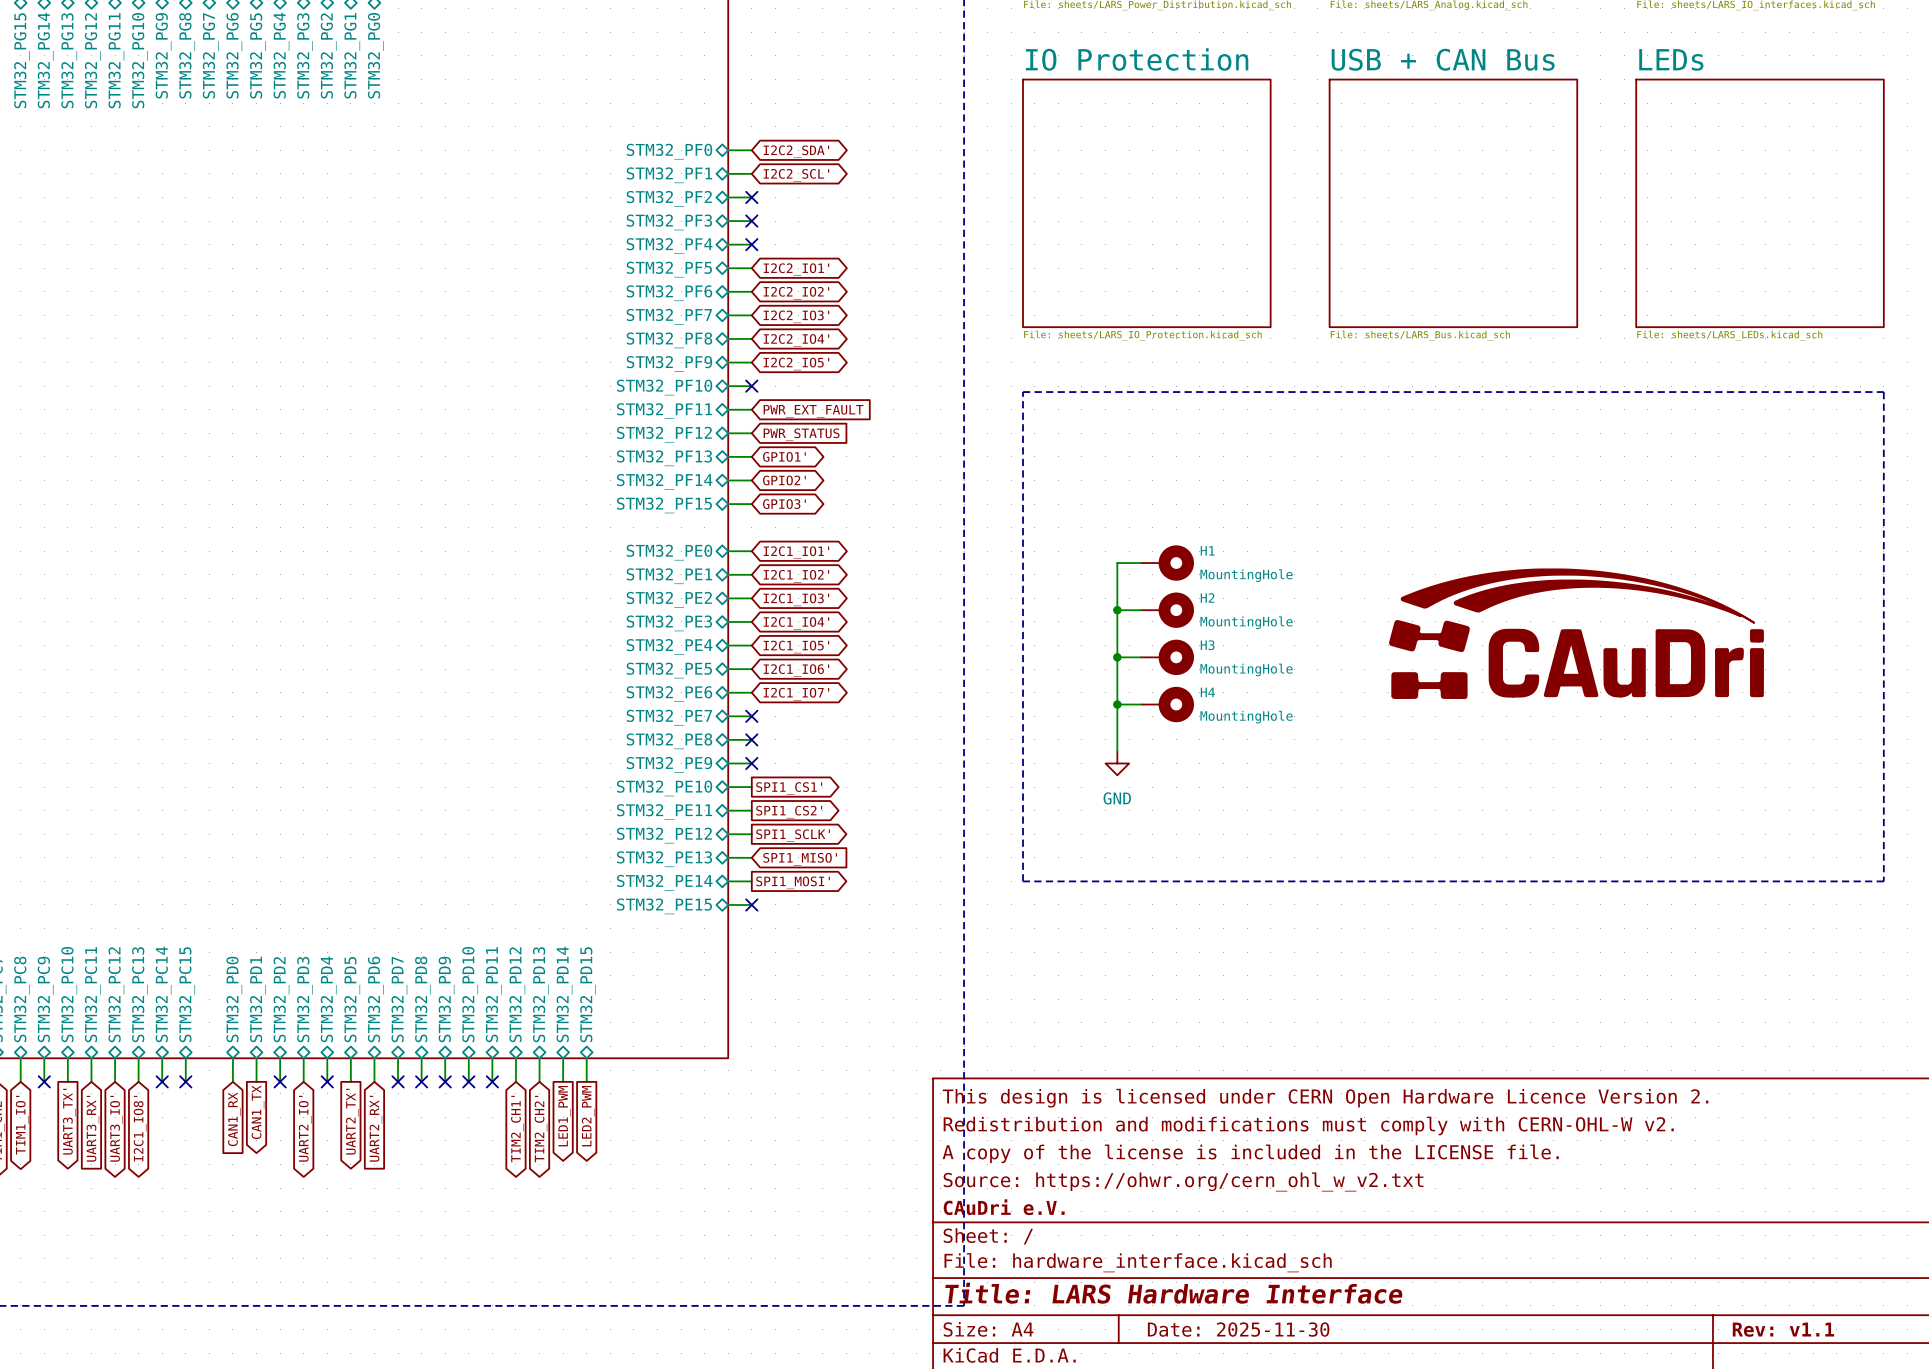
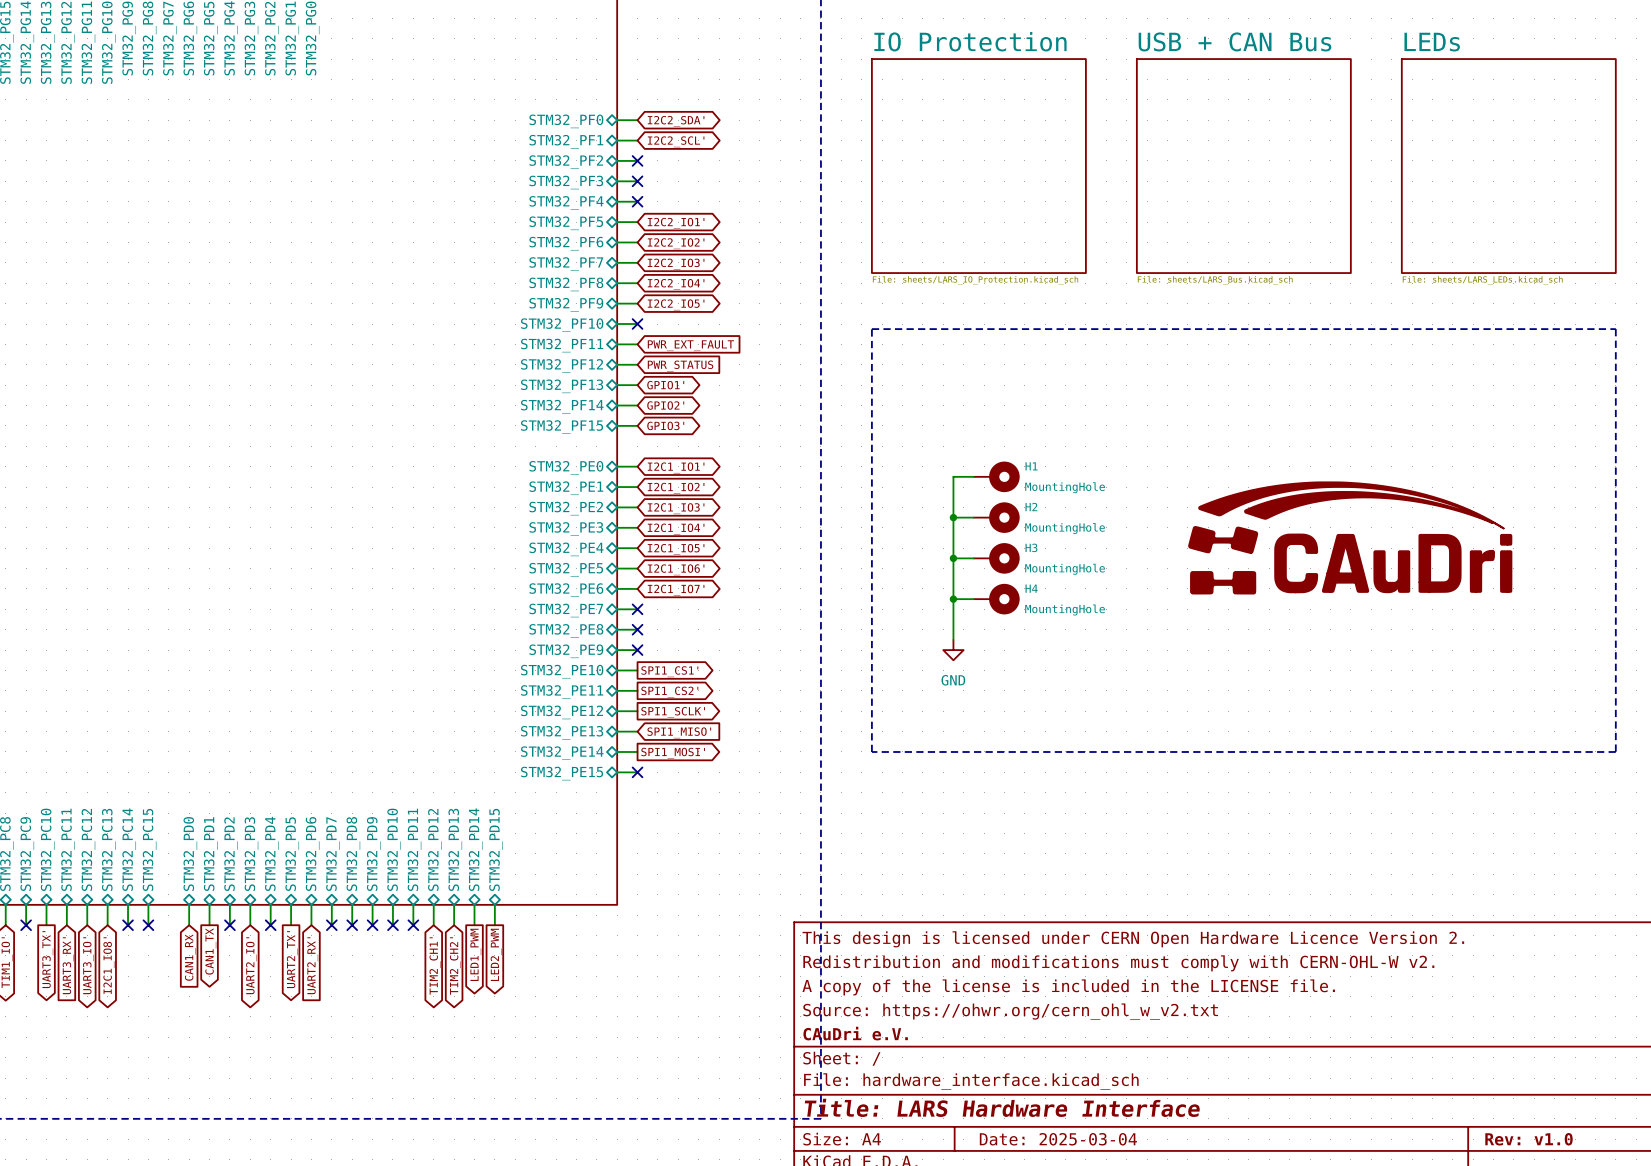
title block: Date: 2025-11-30 (1238, 1329) -> Date: 2025-03-04 (1058, 1139)
title block: Rev: v1.1 (1783, 1329) -> Rev: v1.0 (1528, 1139)

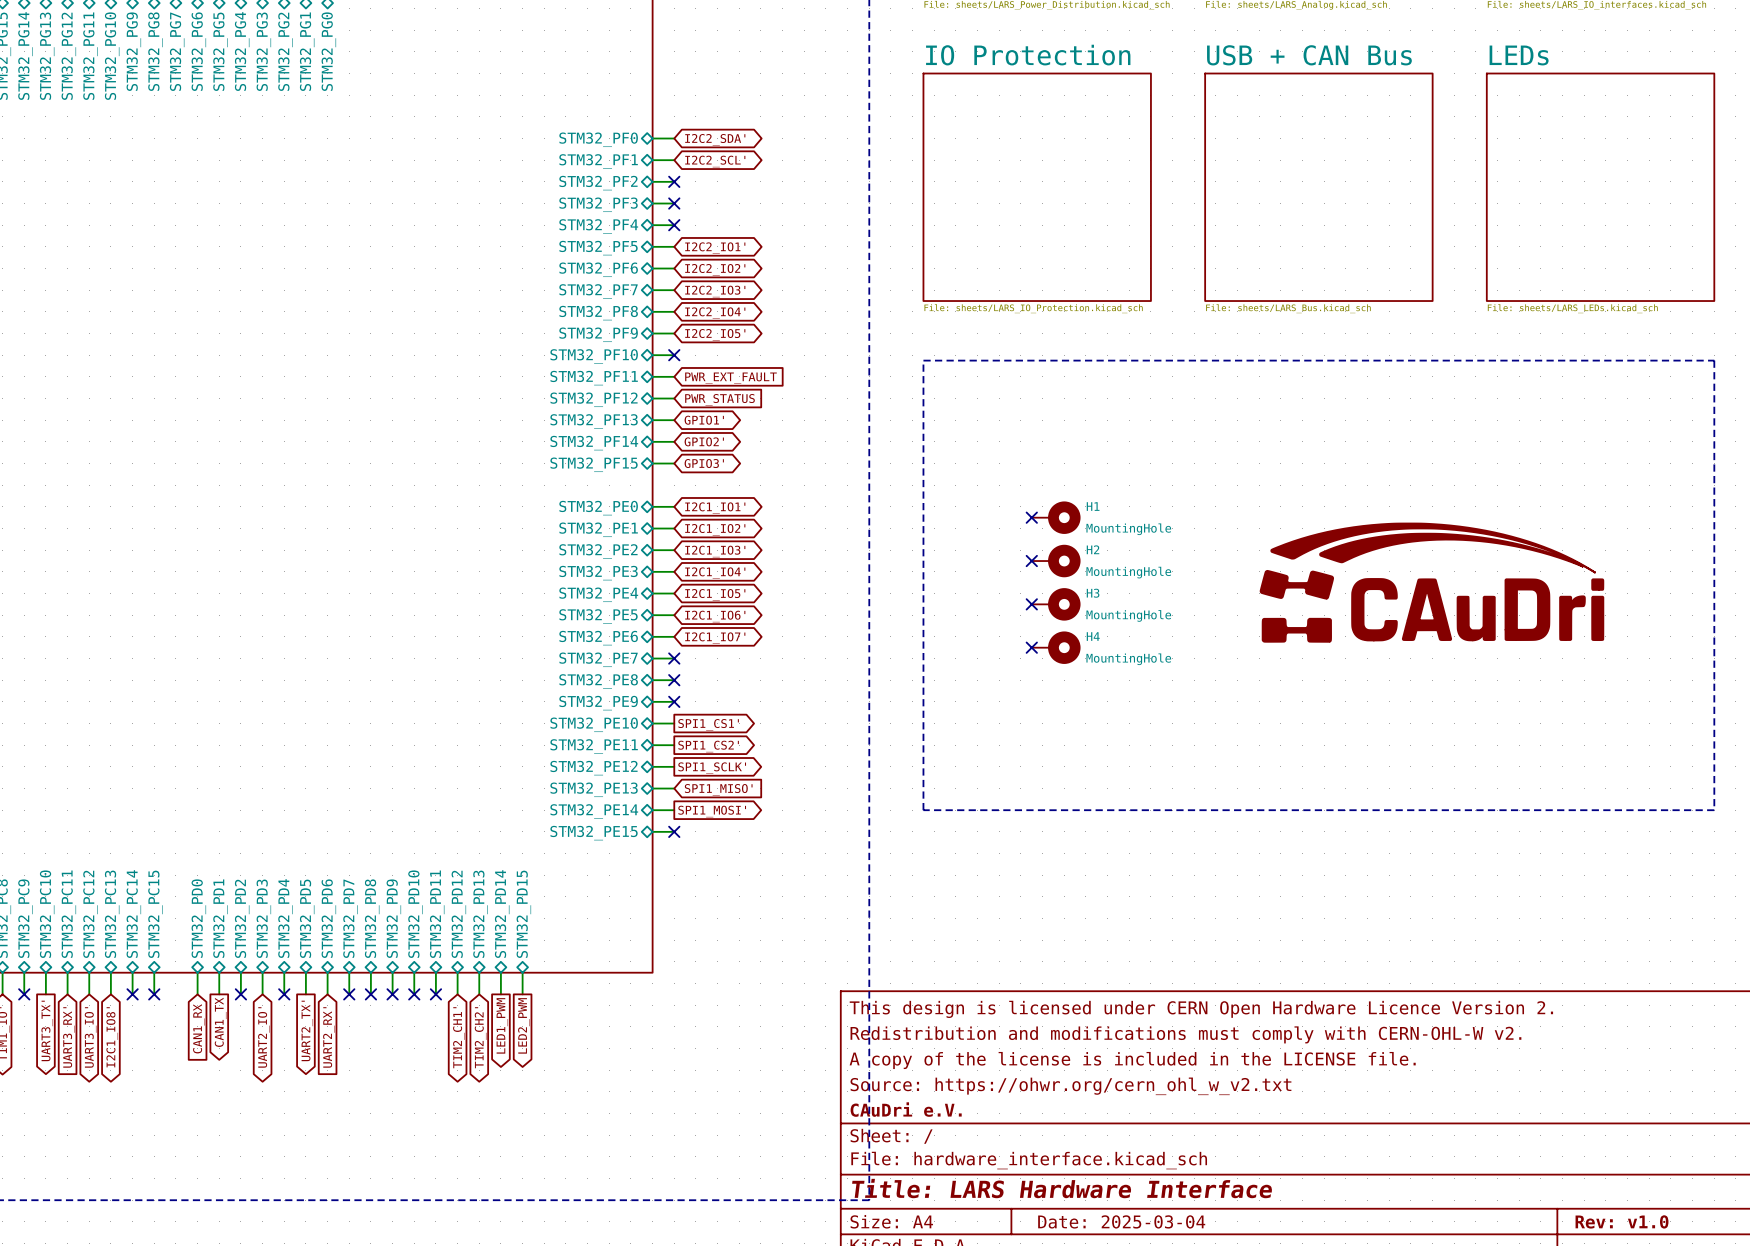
wire: (973, 476) (953, 476) (953, 639) -> none
no-connect mark: none -> (1031, 517)
wire: (953, 517) (973, 517) -> none
junction: (953, 517) -> none
no-connect mark: none -> (1031, 561)
wire: (953, 558) (973, 558) -> none
junction: (953, 558) -> none
no-connect mark: none -> (1031, 604)
wire: (953, 599) (973, 599) -> none
junction: (953, 599) -> none
no-connect mark: none -> (1031, 647)
power symbol: GND (953, 650) -> none

